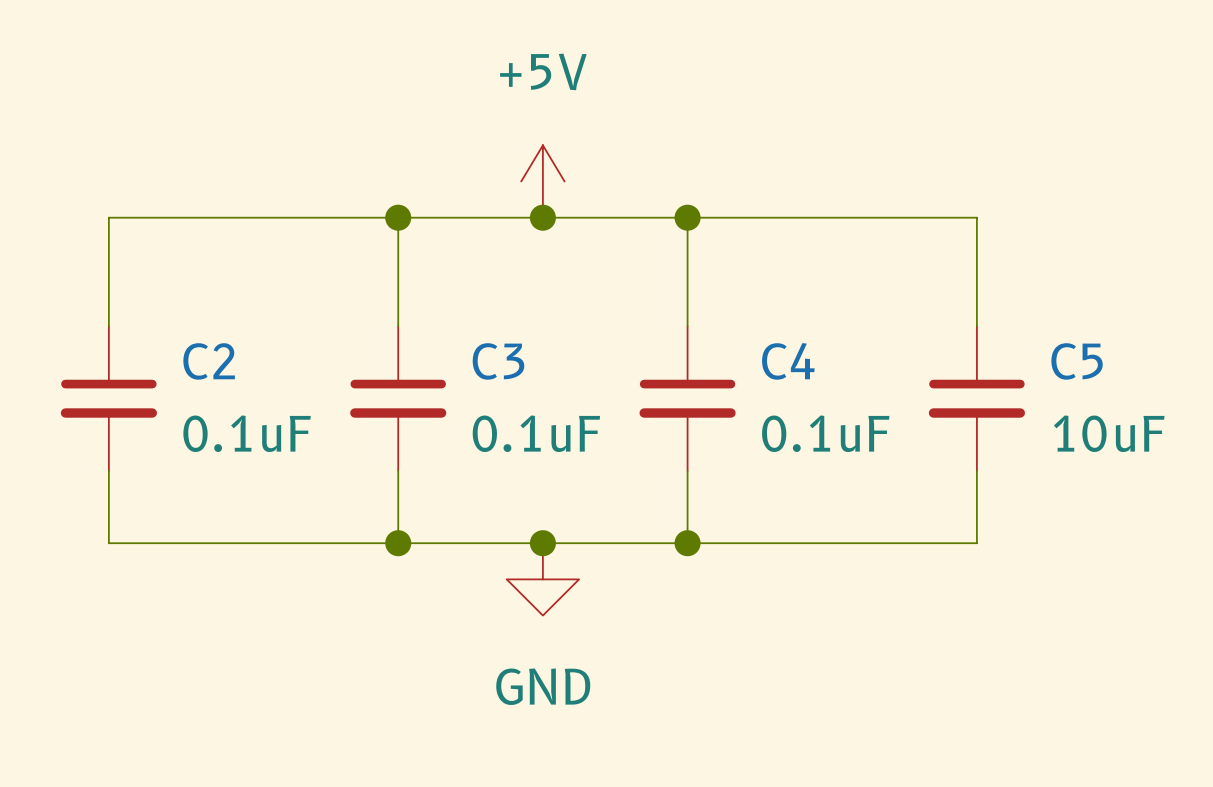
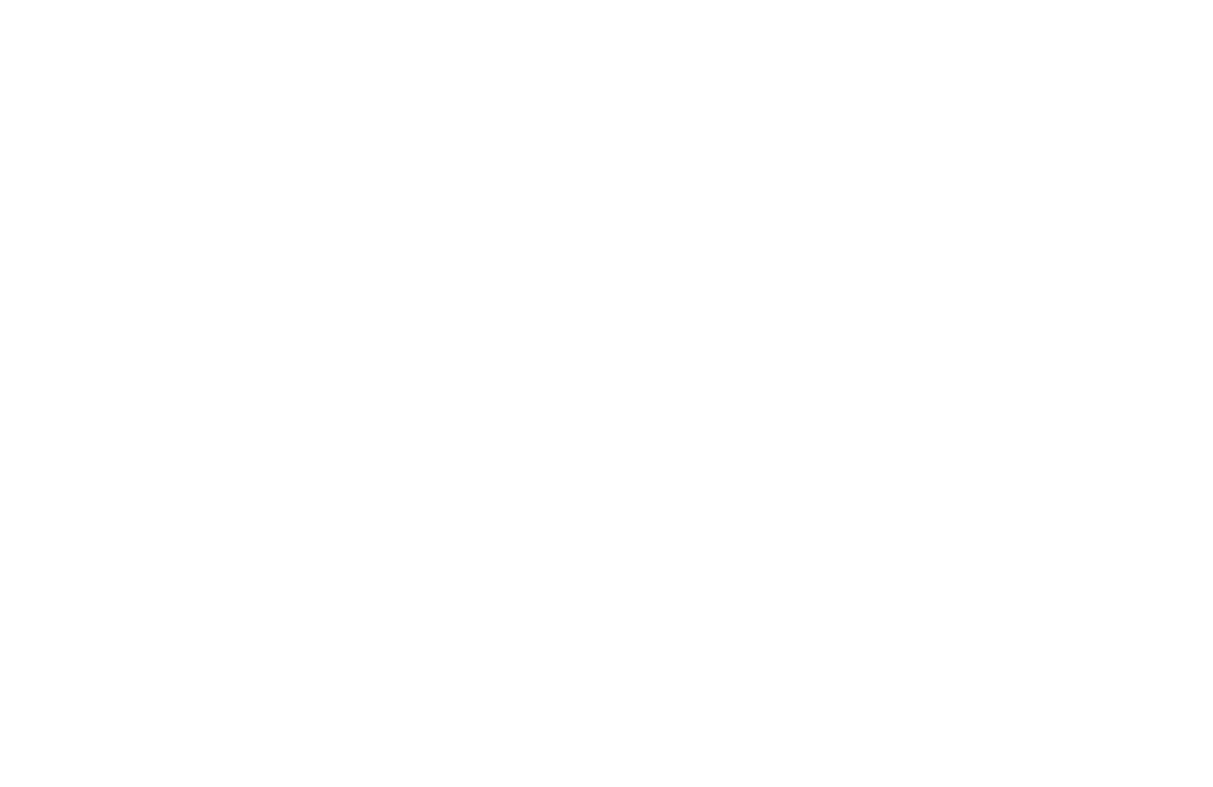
power symbol: +5V (542, 181) -> none
wire: (398, 217) (398, 326) -> none
junction: (398, 217) -> none
junction: (542, 217) -> none
wire: (687, 217) (687, 326) -> none
junction: (687, 217) -> none
wire: (108, 326) (108, 217) (976, 217) (976, 326) -> none
C2: 0.1uF (108, 398) -> none
C3: 0.1uF (398, 398) -> none
C4: 0.1uF (687, 398) -> none
C5: 10uF (976, 398) -> none
wire: (108, 470) (108, 543) (976, 543) (976, 470) -> none
wire: (398, 470) (398, 543) -> none
wire: (687, 470) (687, 543) -> none
junction: (398, 543) -> none
junction: (542, 543) -> none
junction: (687, 543) -> none
power symbol: GND (542, 579) -> none

